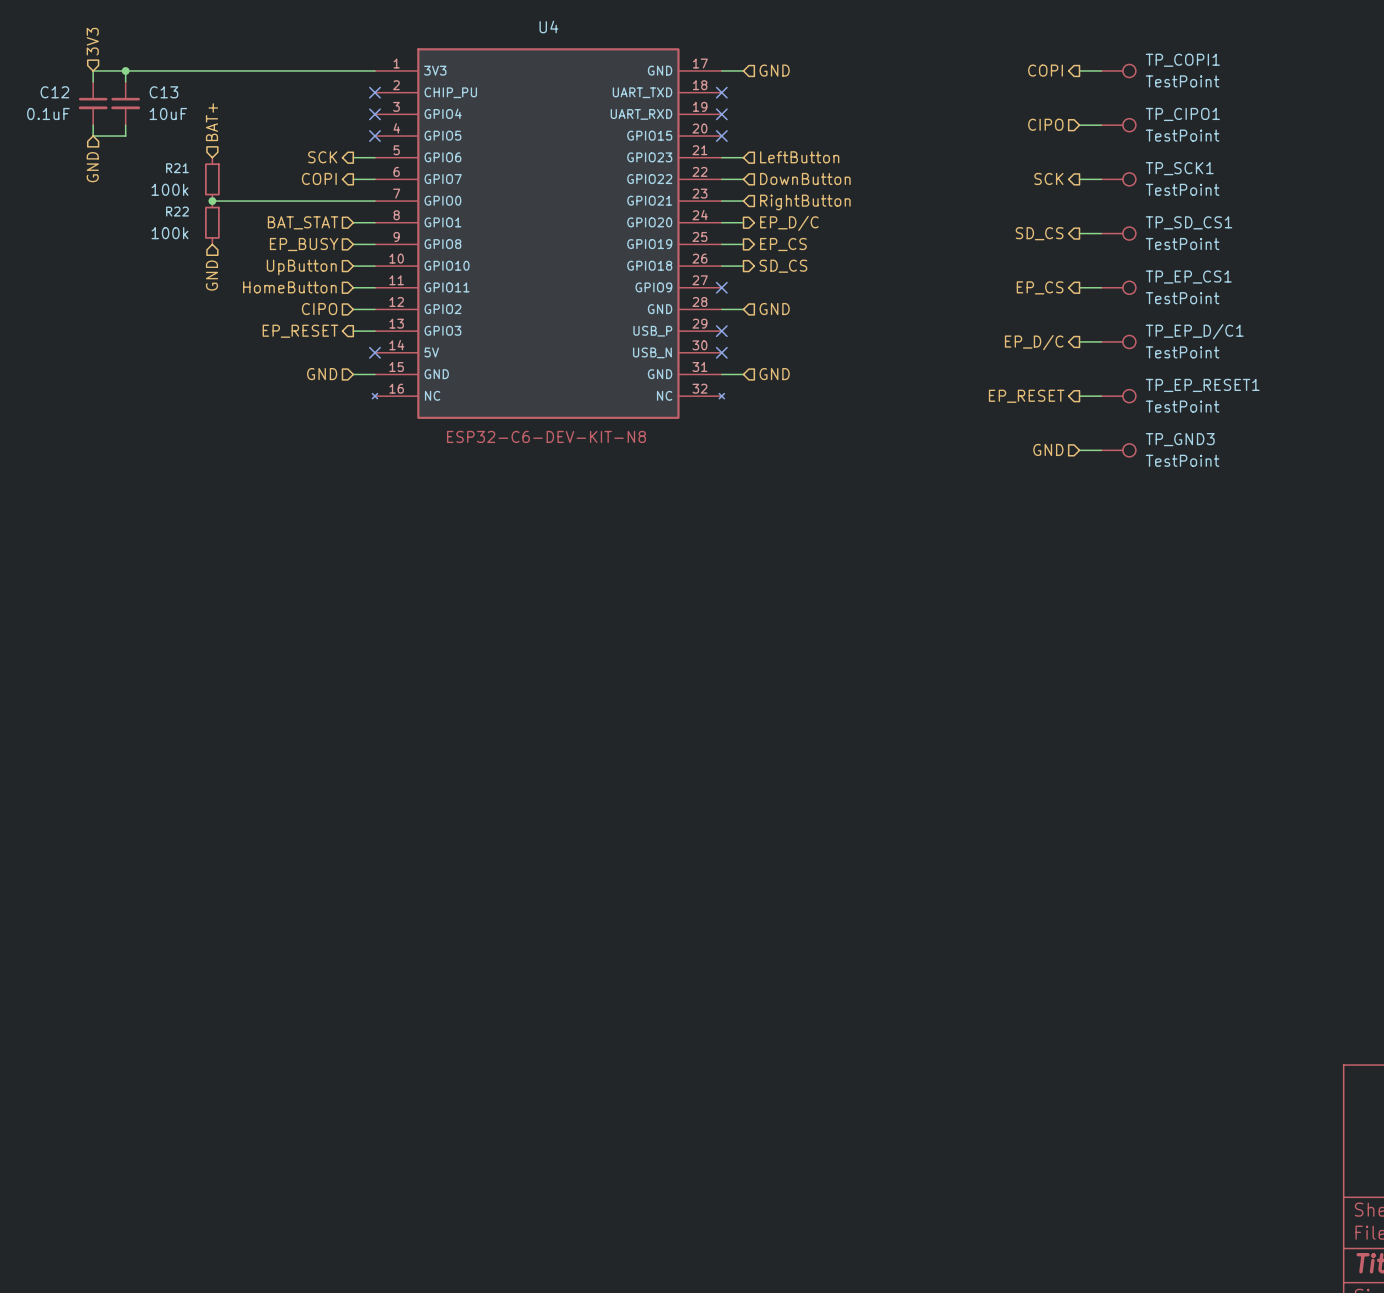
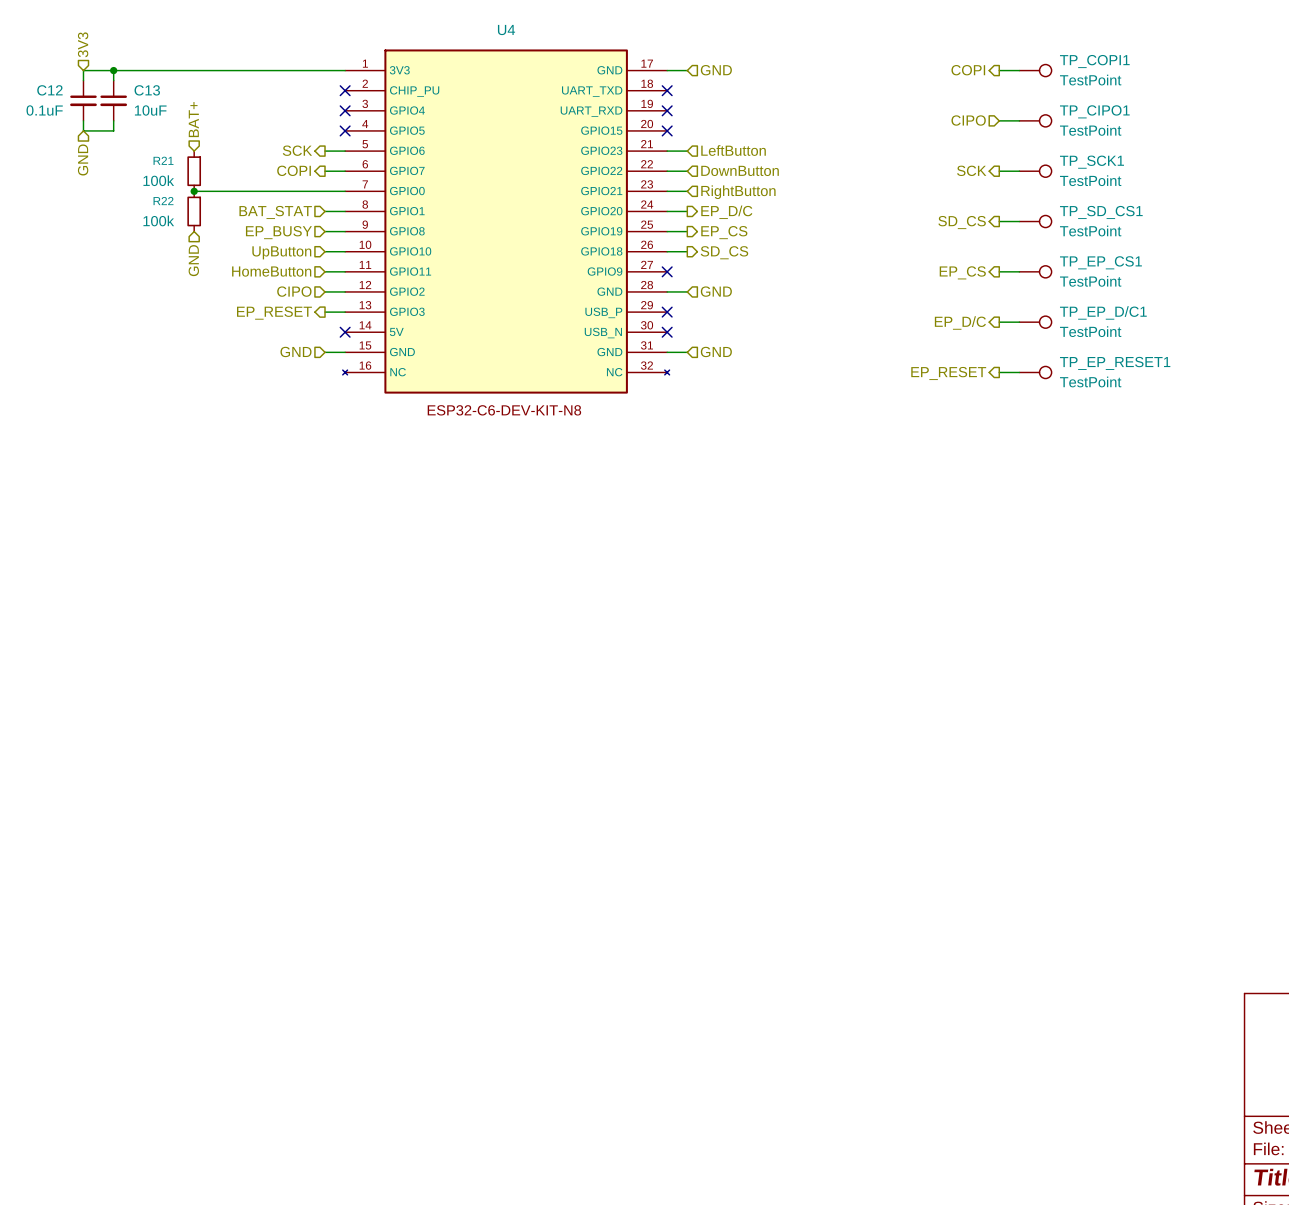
hierarchical label: GND (1048, 449) -> none
wire: (1079, 450) (1101, 450) -> none
TP_GND3: TestPoint (1118, 450) -> none

